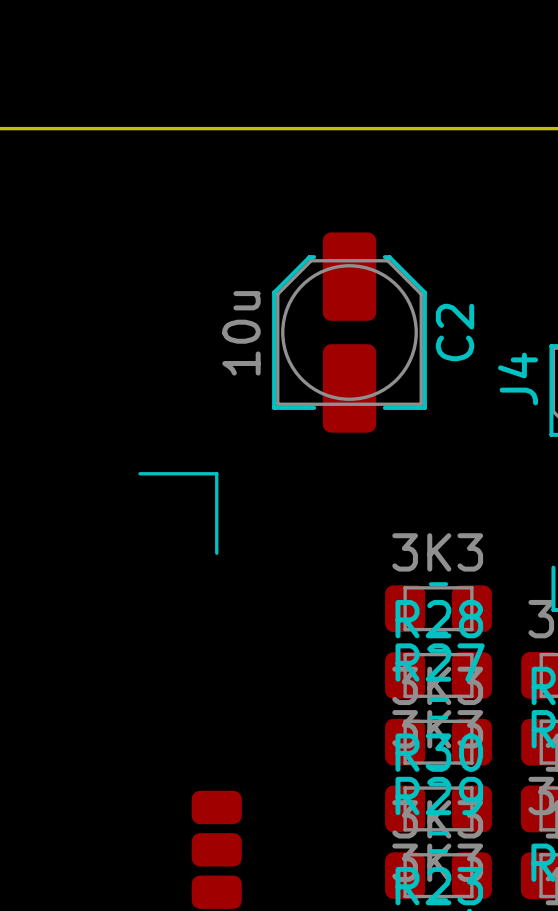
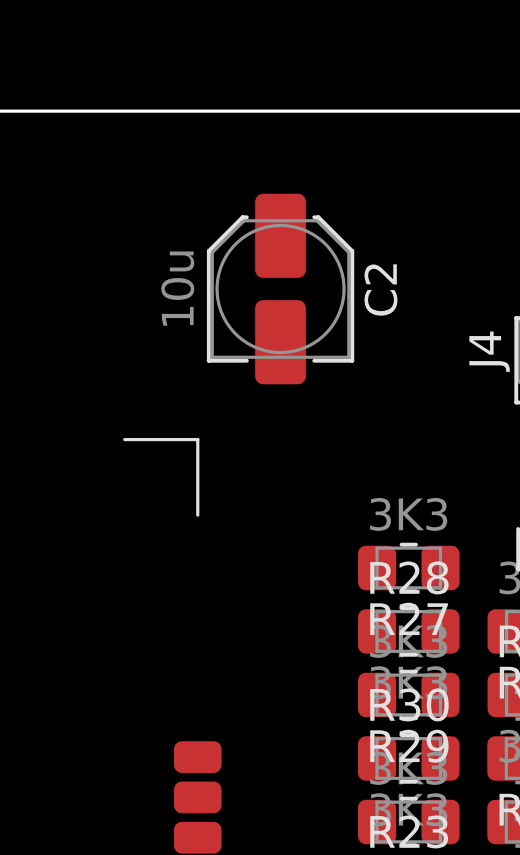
C2 position: (349, 332) -> (280, 289)

